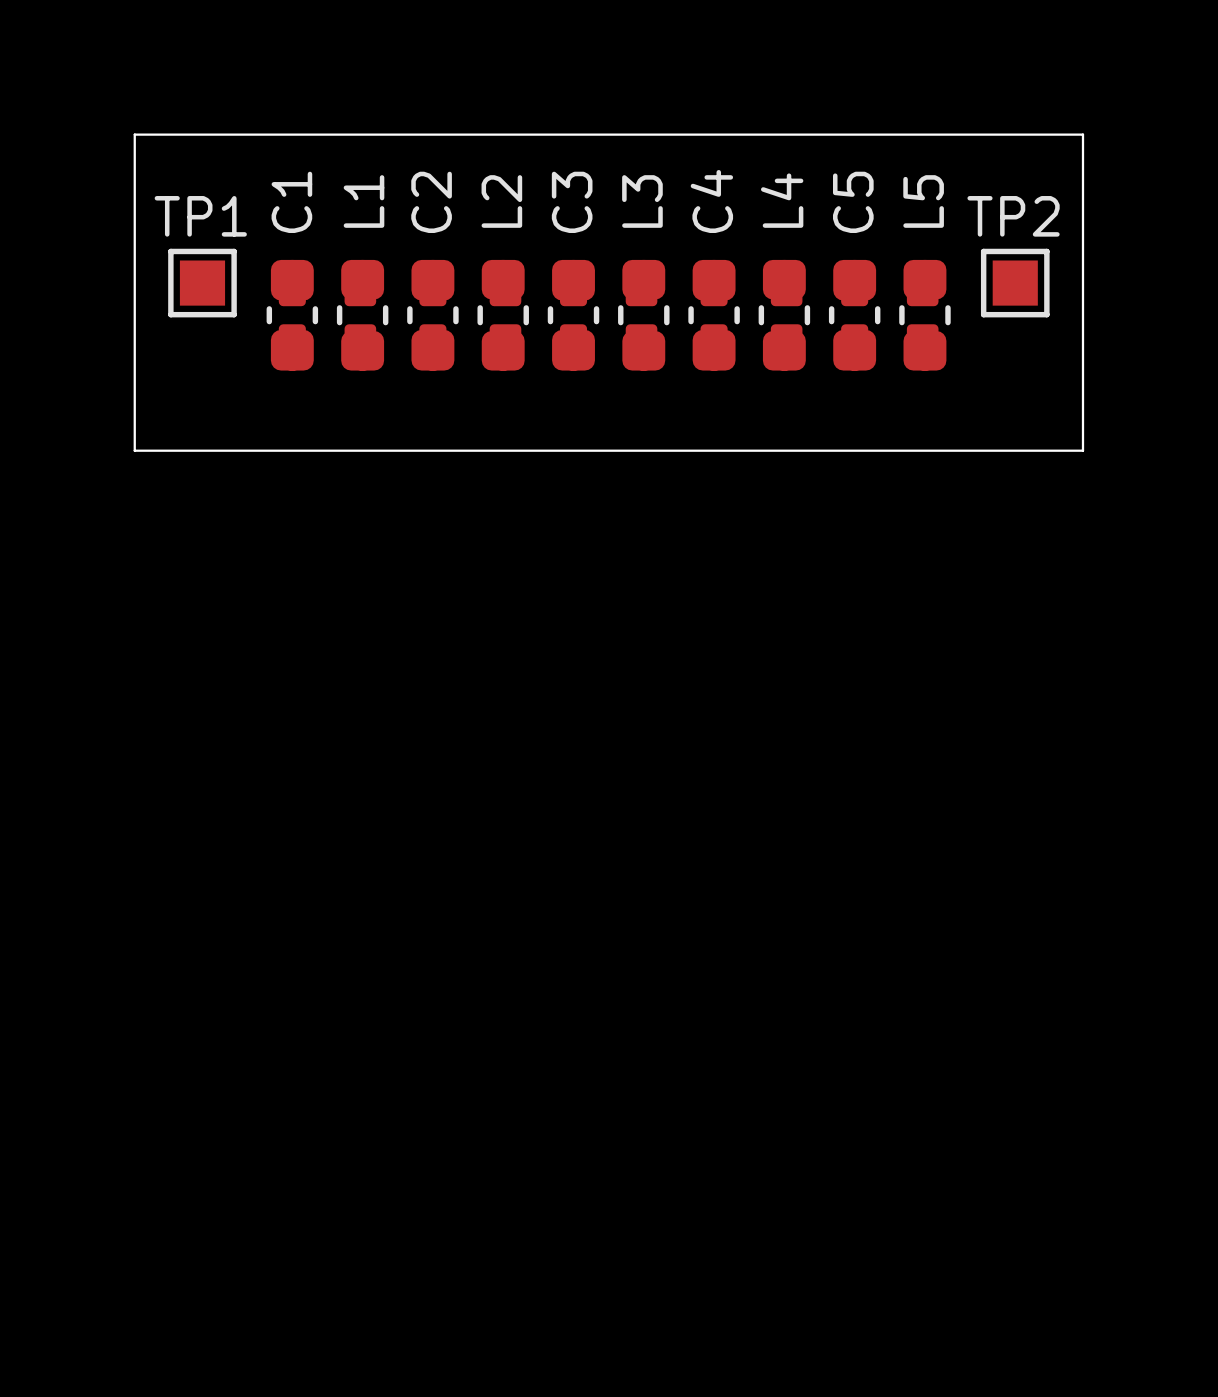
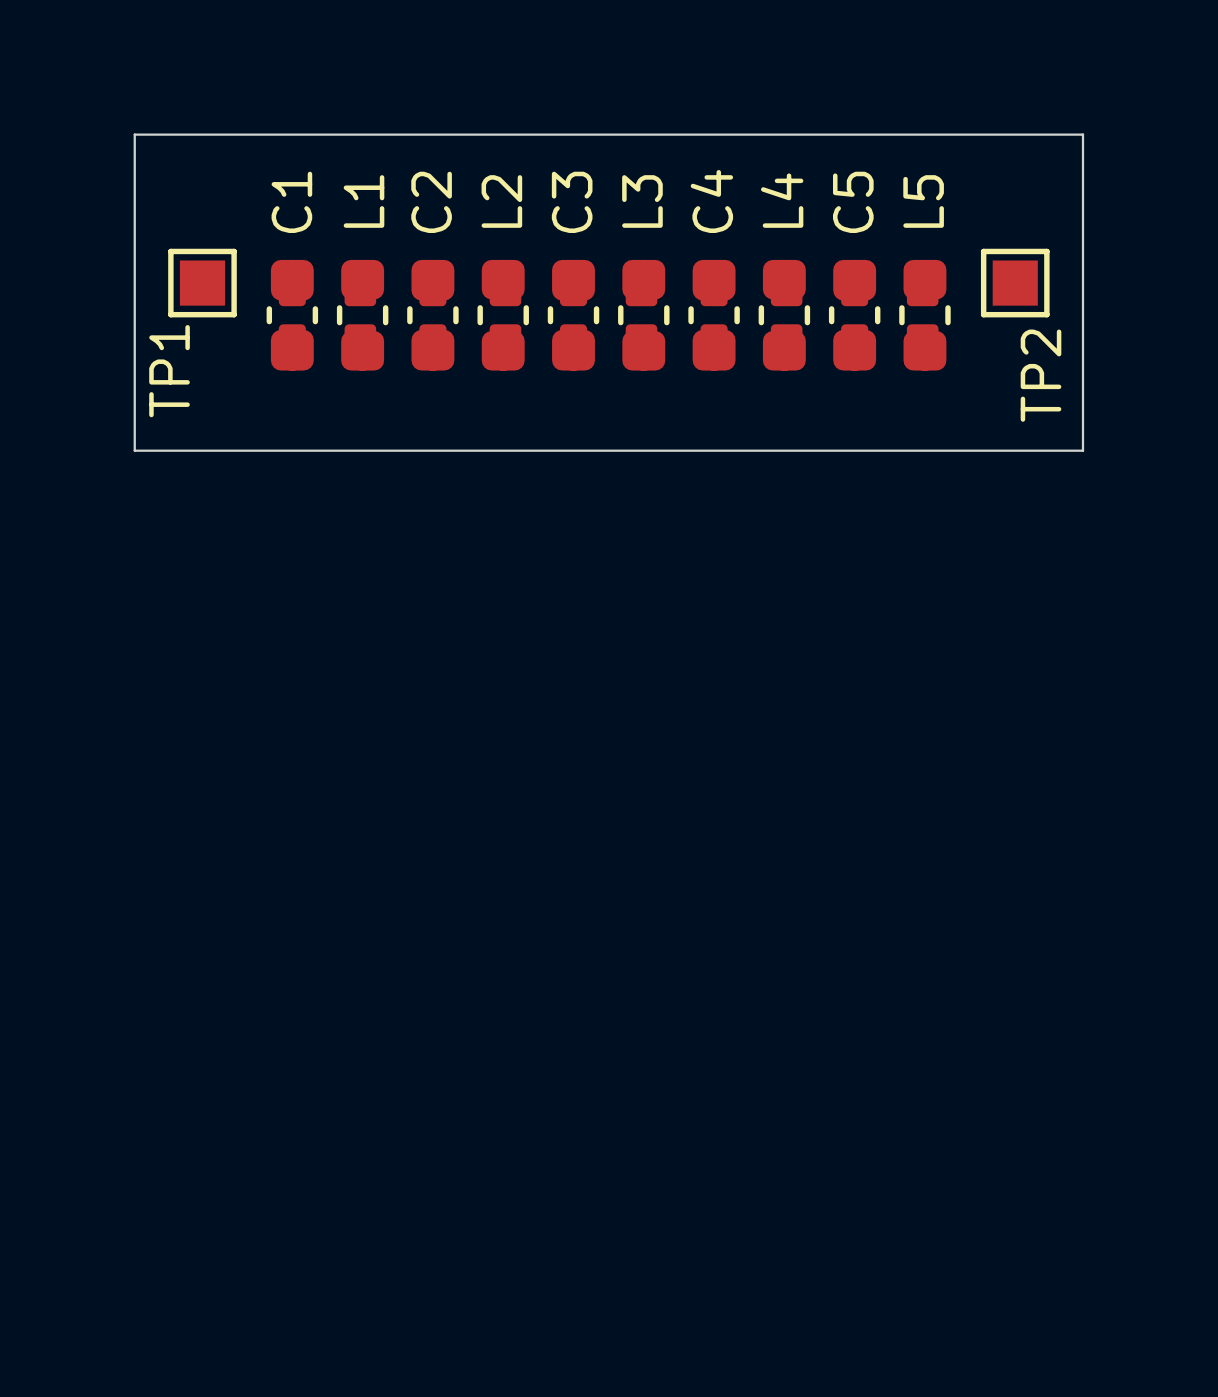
TP1 name rotation: 0° (200, 216) -> 90° counterclockwise (169, 371)
TP1 name position: TP1 (200, 216) -> TP1 (169, 371)
TP2 name rotation: 0° (1013, 216) -> 90° counterclockwise (1041, 375)
TP2 name position: TP2 (1013, 216) -> TP2 (1041, 375)

